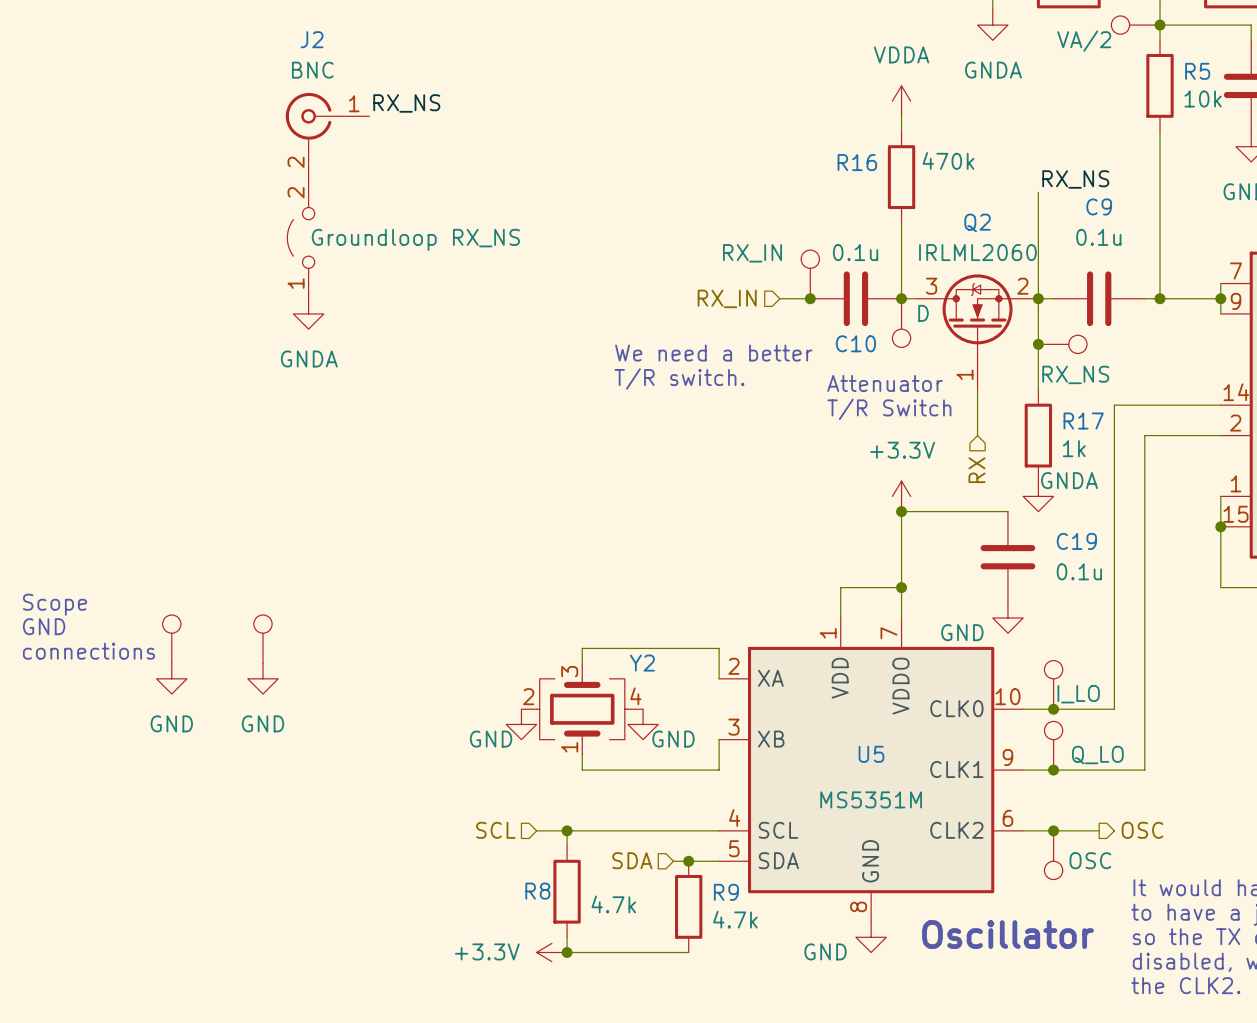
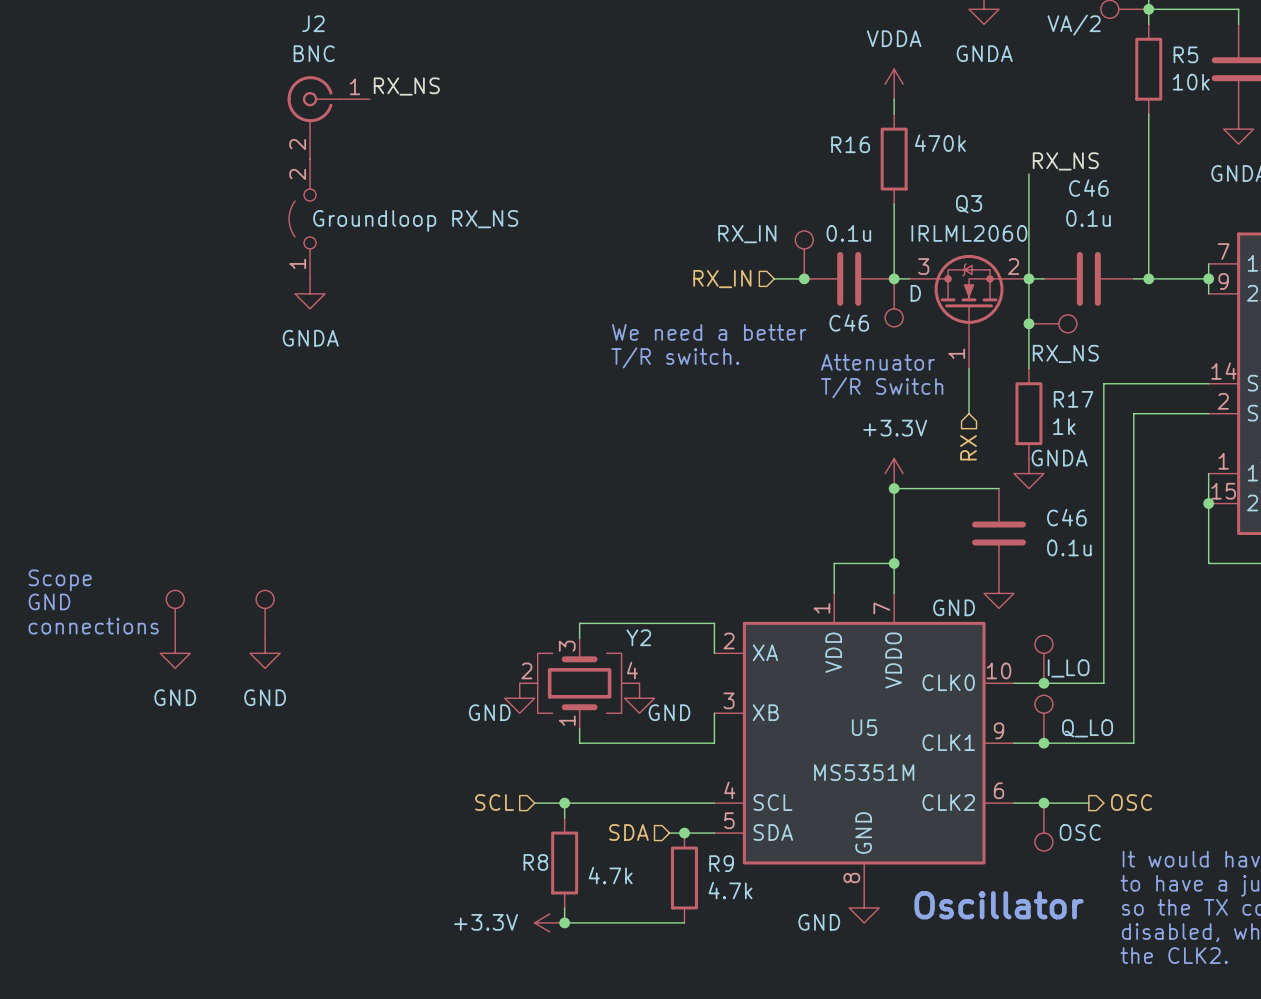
C9 name: C9 (1099, 206) -> C46 (1088, 188)
Q2 name: Q2 (977, 222) -> Q3 (969, 204)
C10 name: C10 (855, 343) -> C46 (849, 322)
C19 name: C19 (1076, 541) -> C46 (1066, 517)

